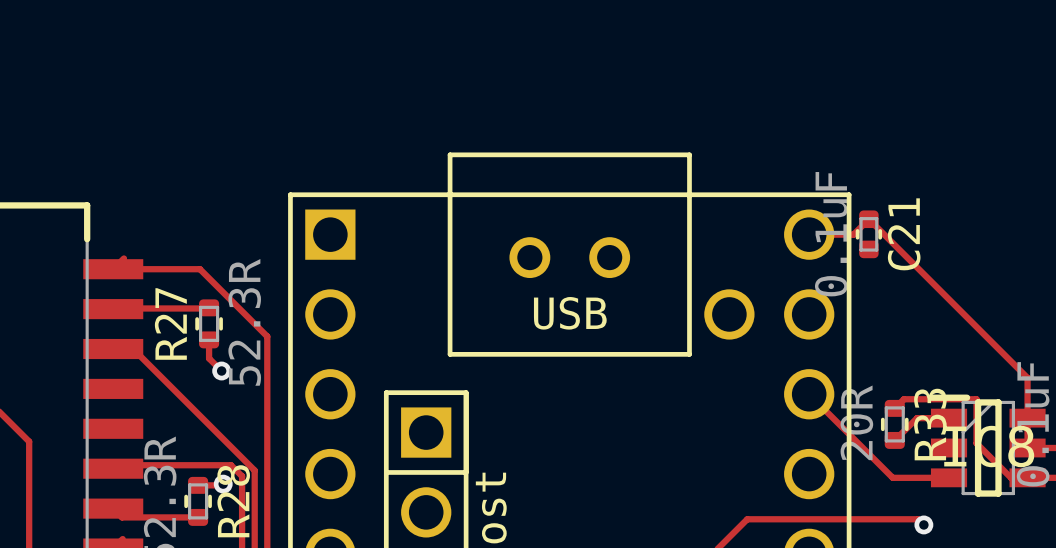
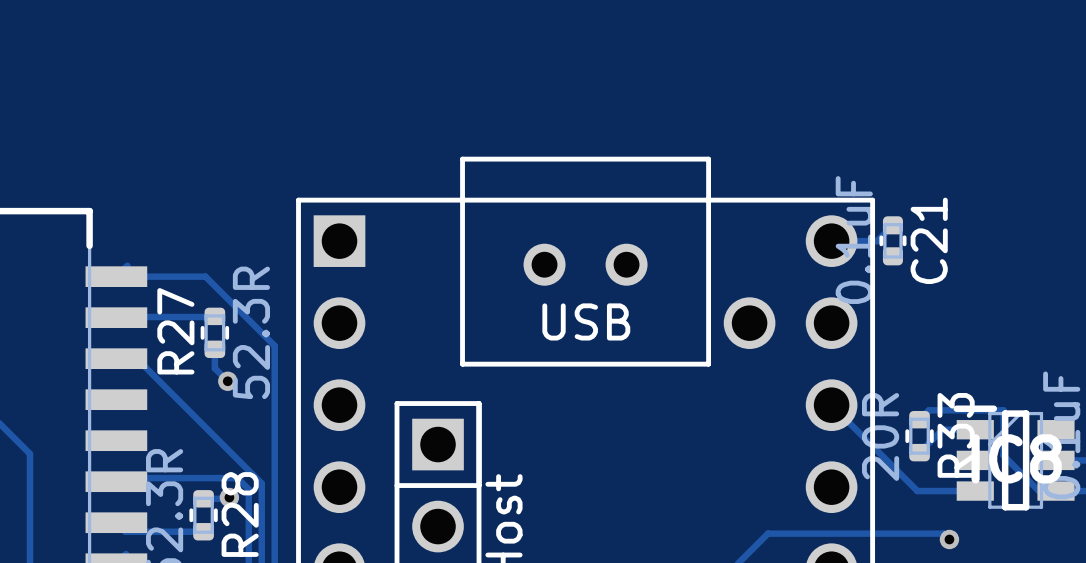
track: (868, 219) (1027, 377) (1027, 418) -> none

